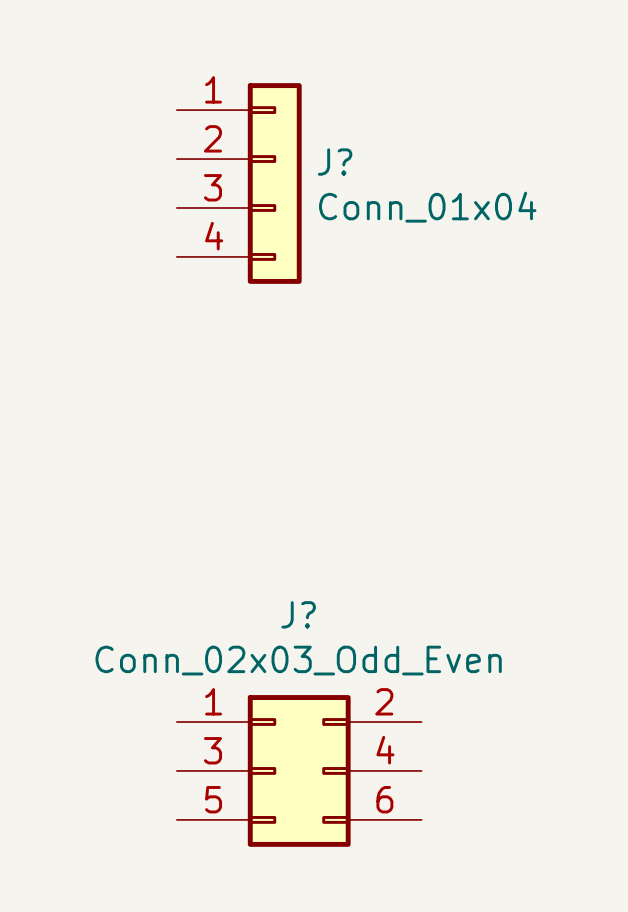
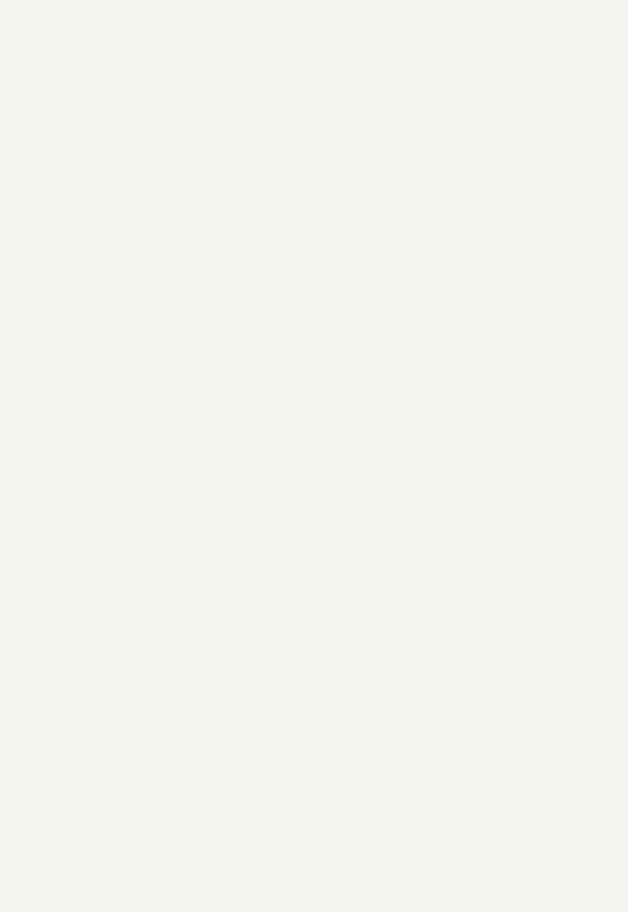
J?: Conn_01x04 (239, 183) -> none
J?: Conn_02x03_Odd_Even (299, 770) -> none

